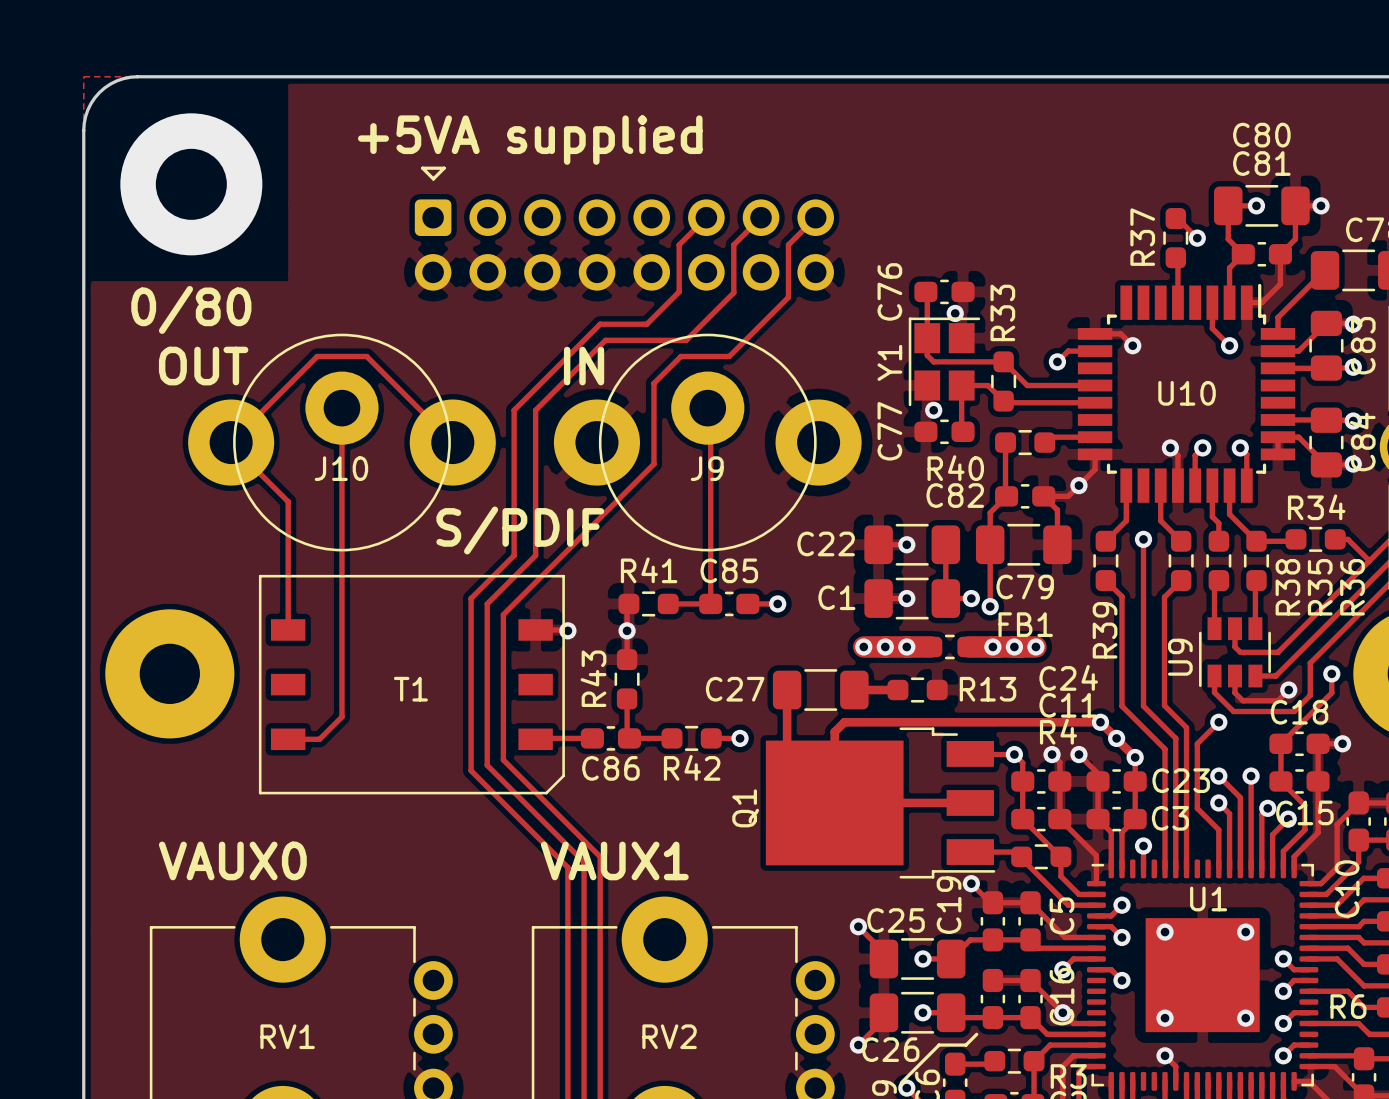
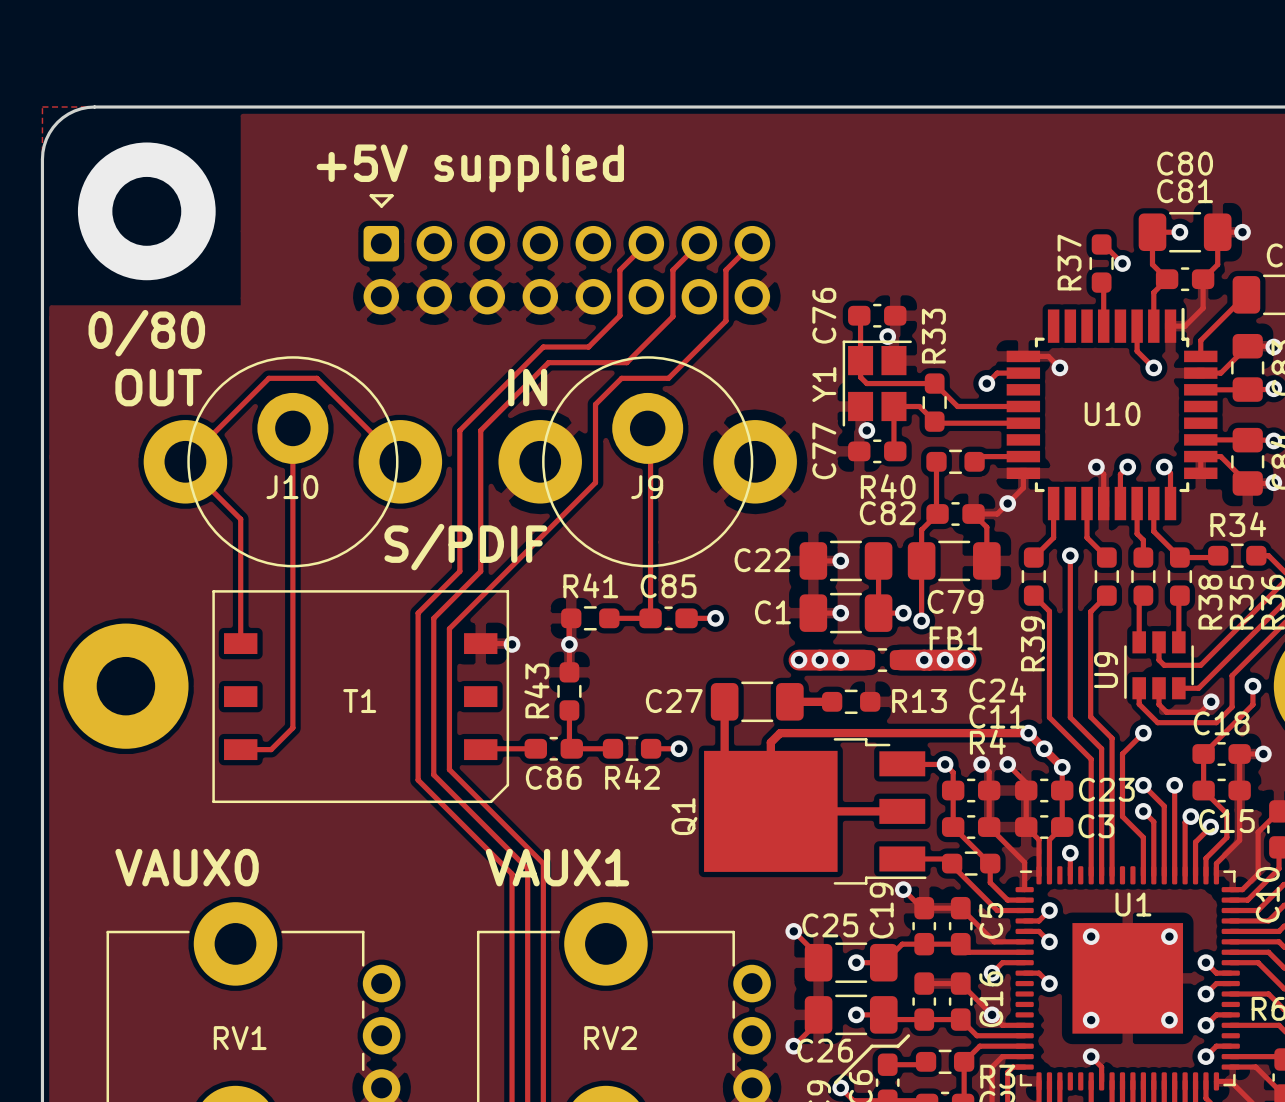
text: +5VA supplied (530, 140) -> +5V supplied (470, 168)

